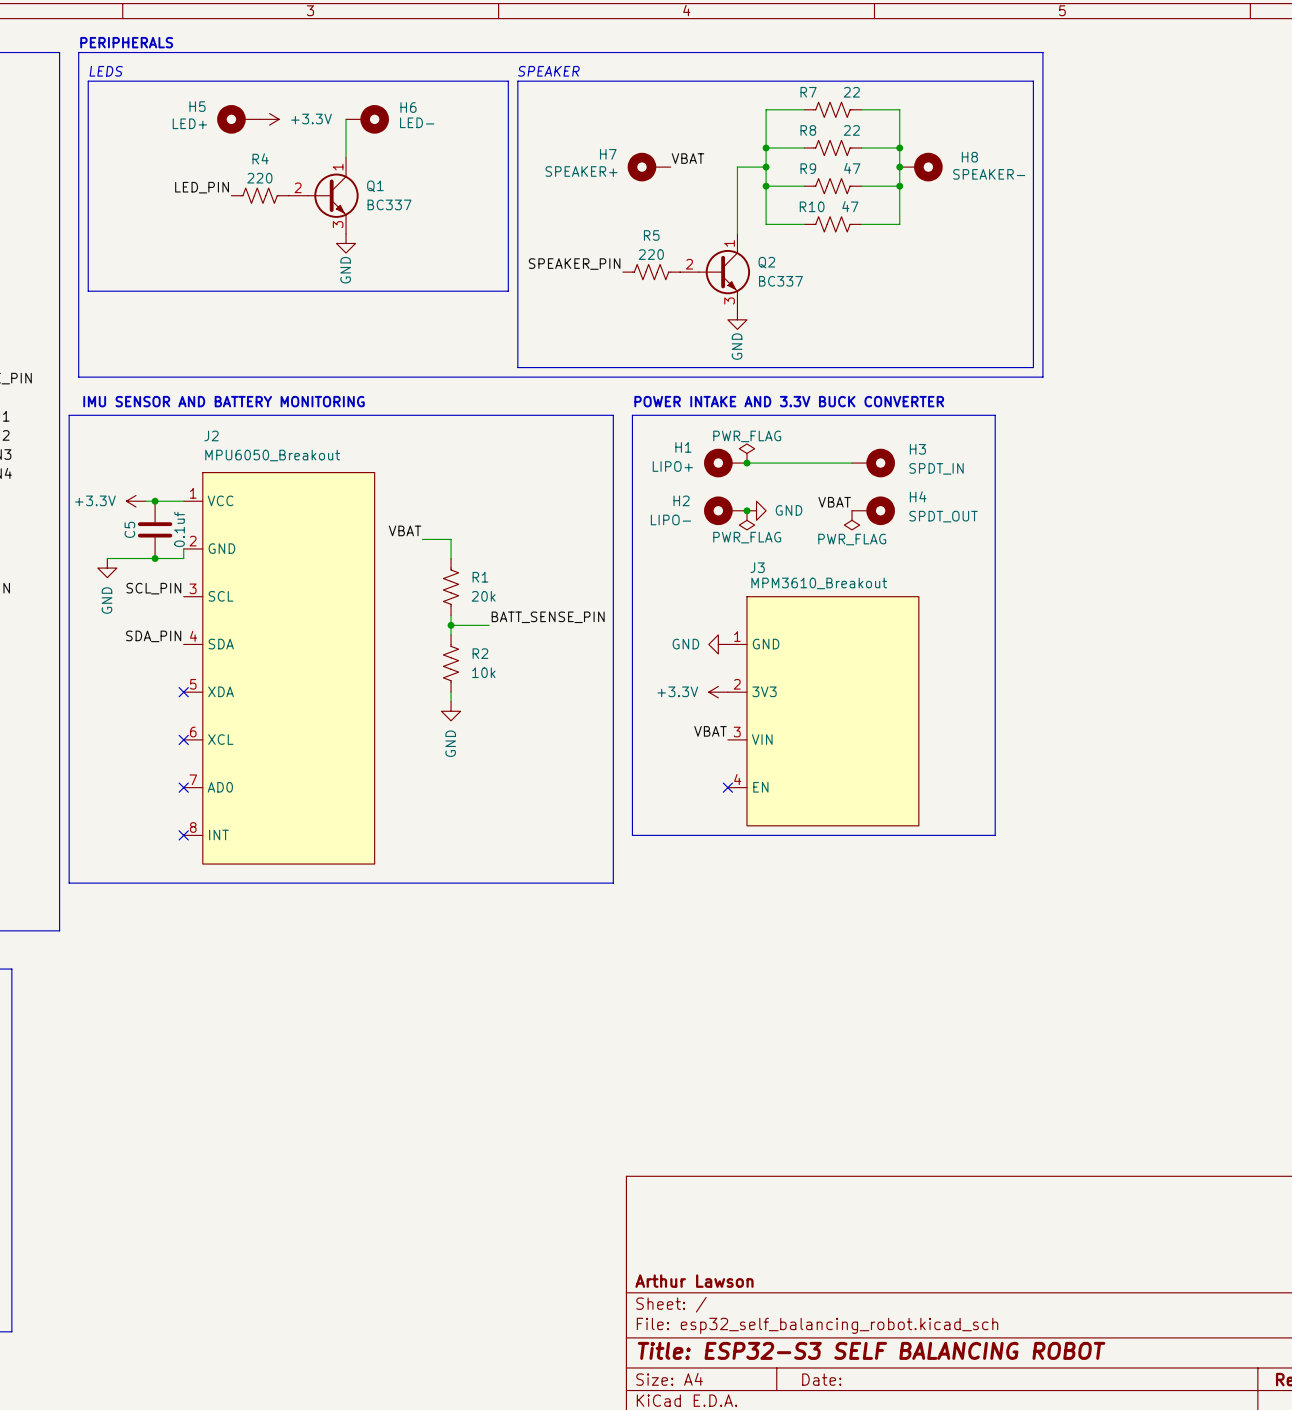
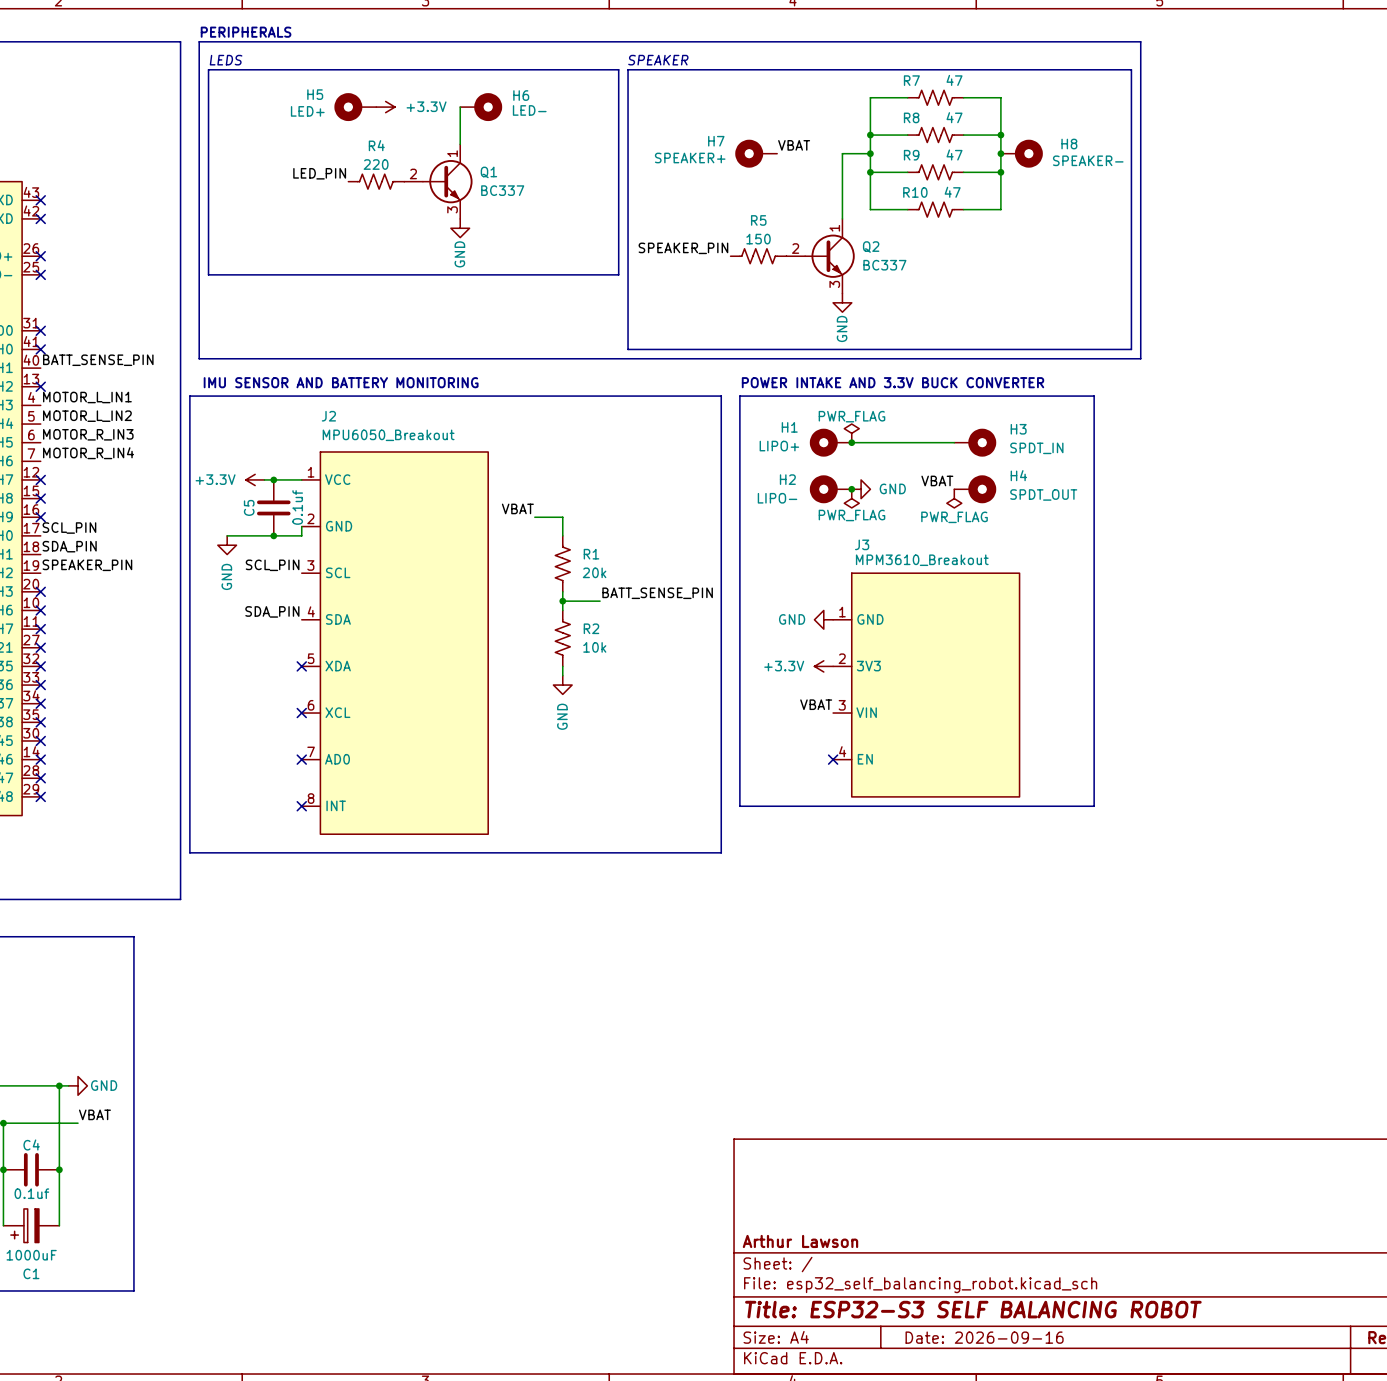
R7 value: 22 (851, 92) -> 47 (954, 80)
R8 value: 22 (851, 130) -> 47 (954, 117)
R5 value: 220 (651, 254) -> 150 (758, 239)
title block: Date: (821, 1379) -> Date: 2026-09-16 (984, 1337)

